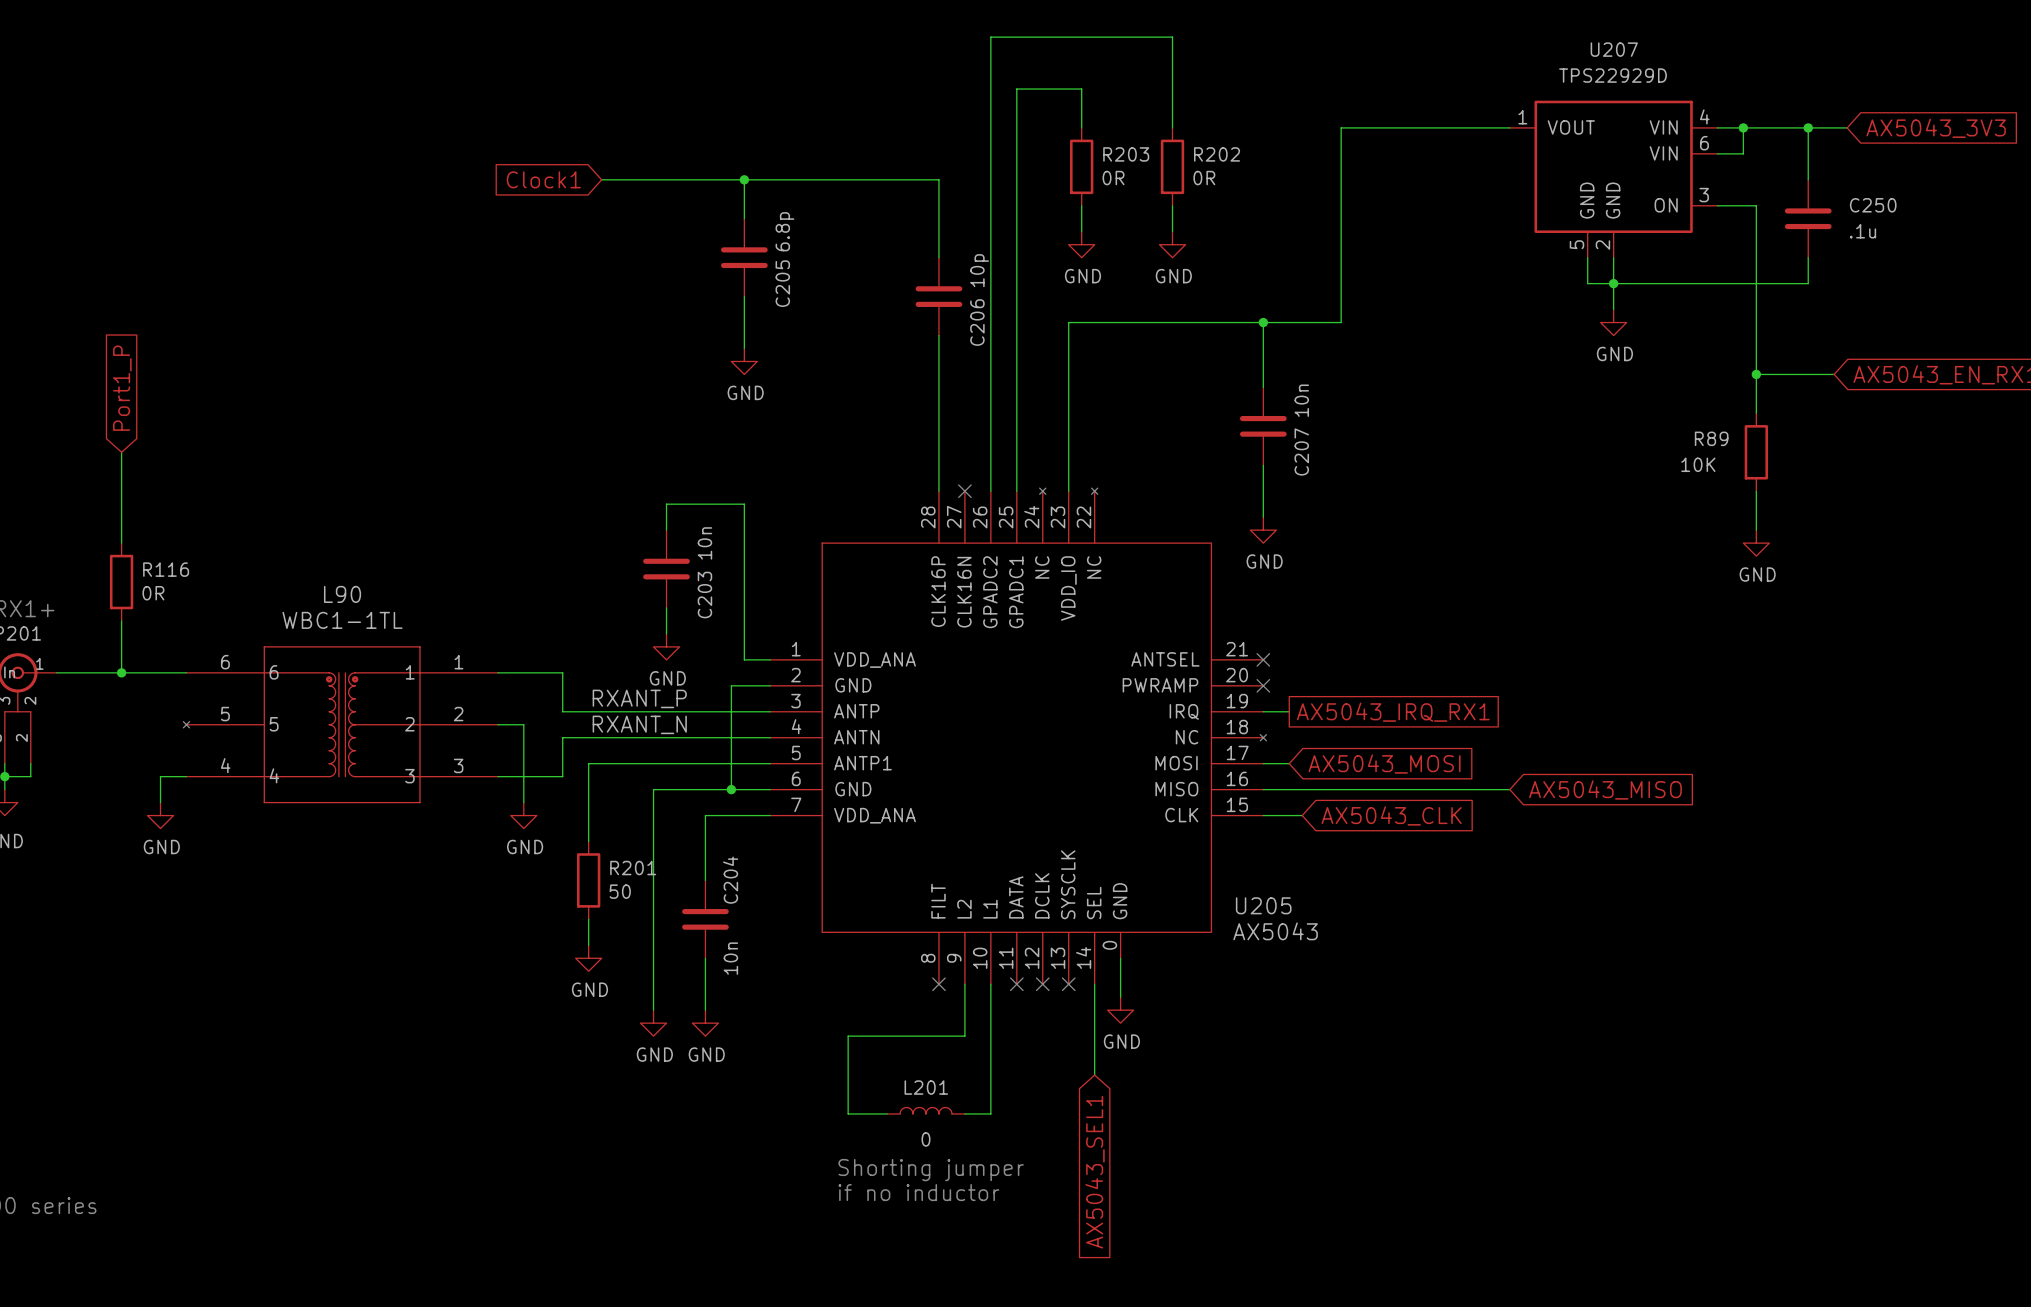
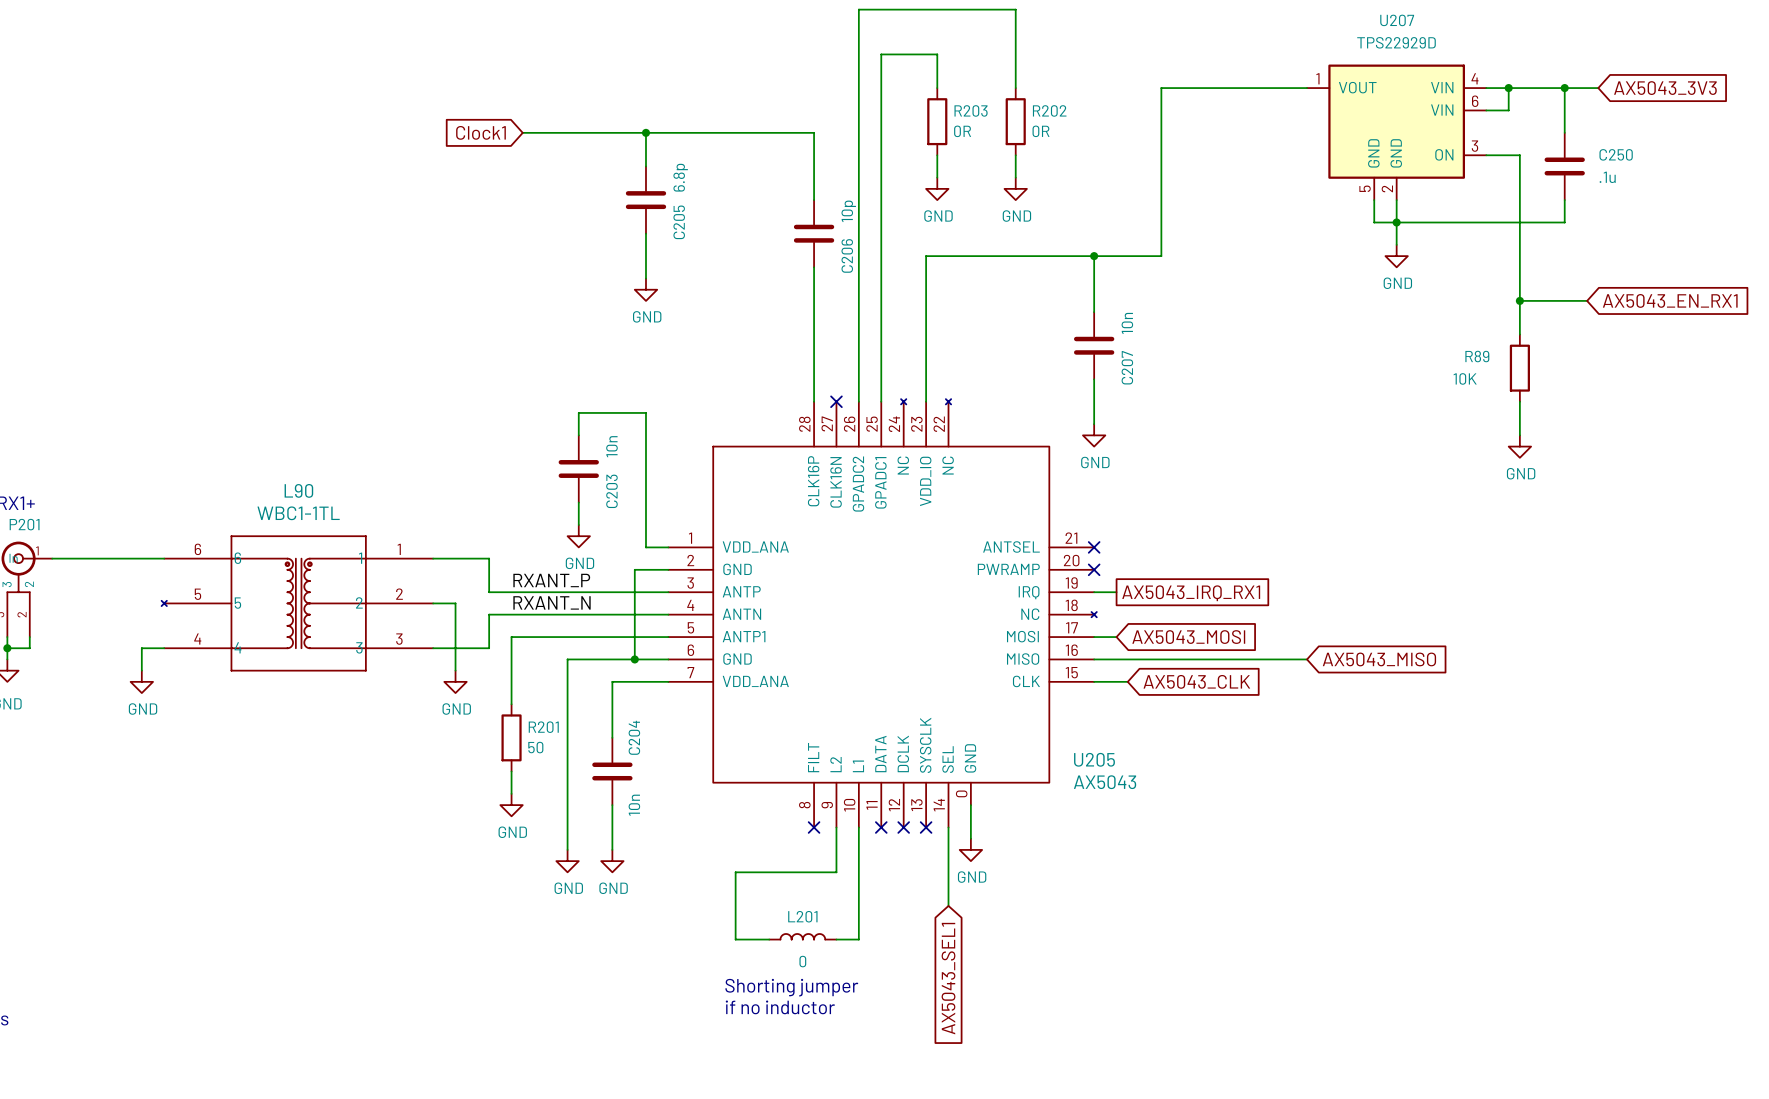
global label: Port1_P (122, 388) -> none
wire: (121, 452) (121, 543) -> none
R116: 0R (121, 582) -> none
wire: (121, 620) (121, 672) -> none
junction: (121, 672) -> none

